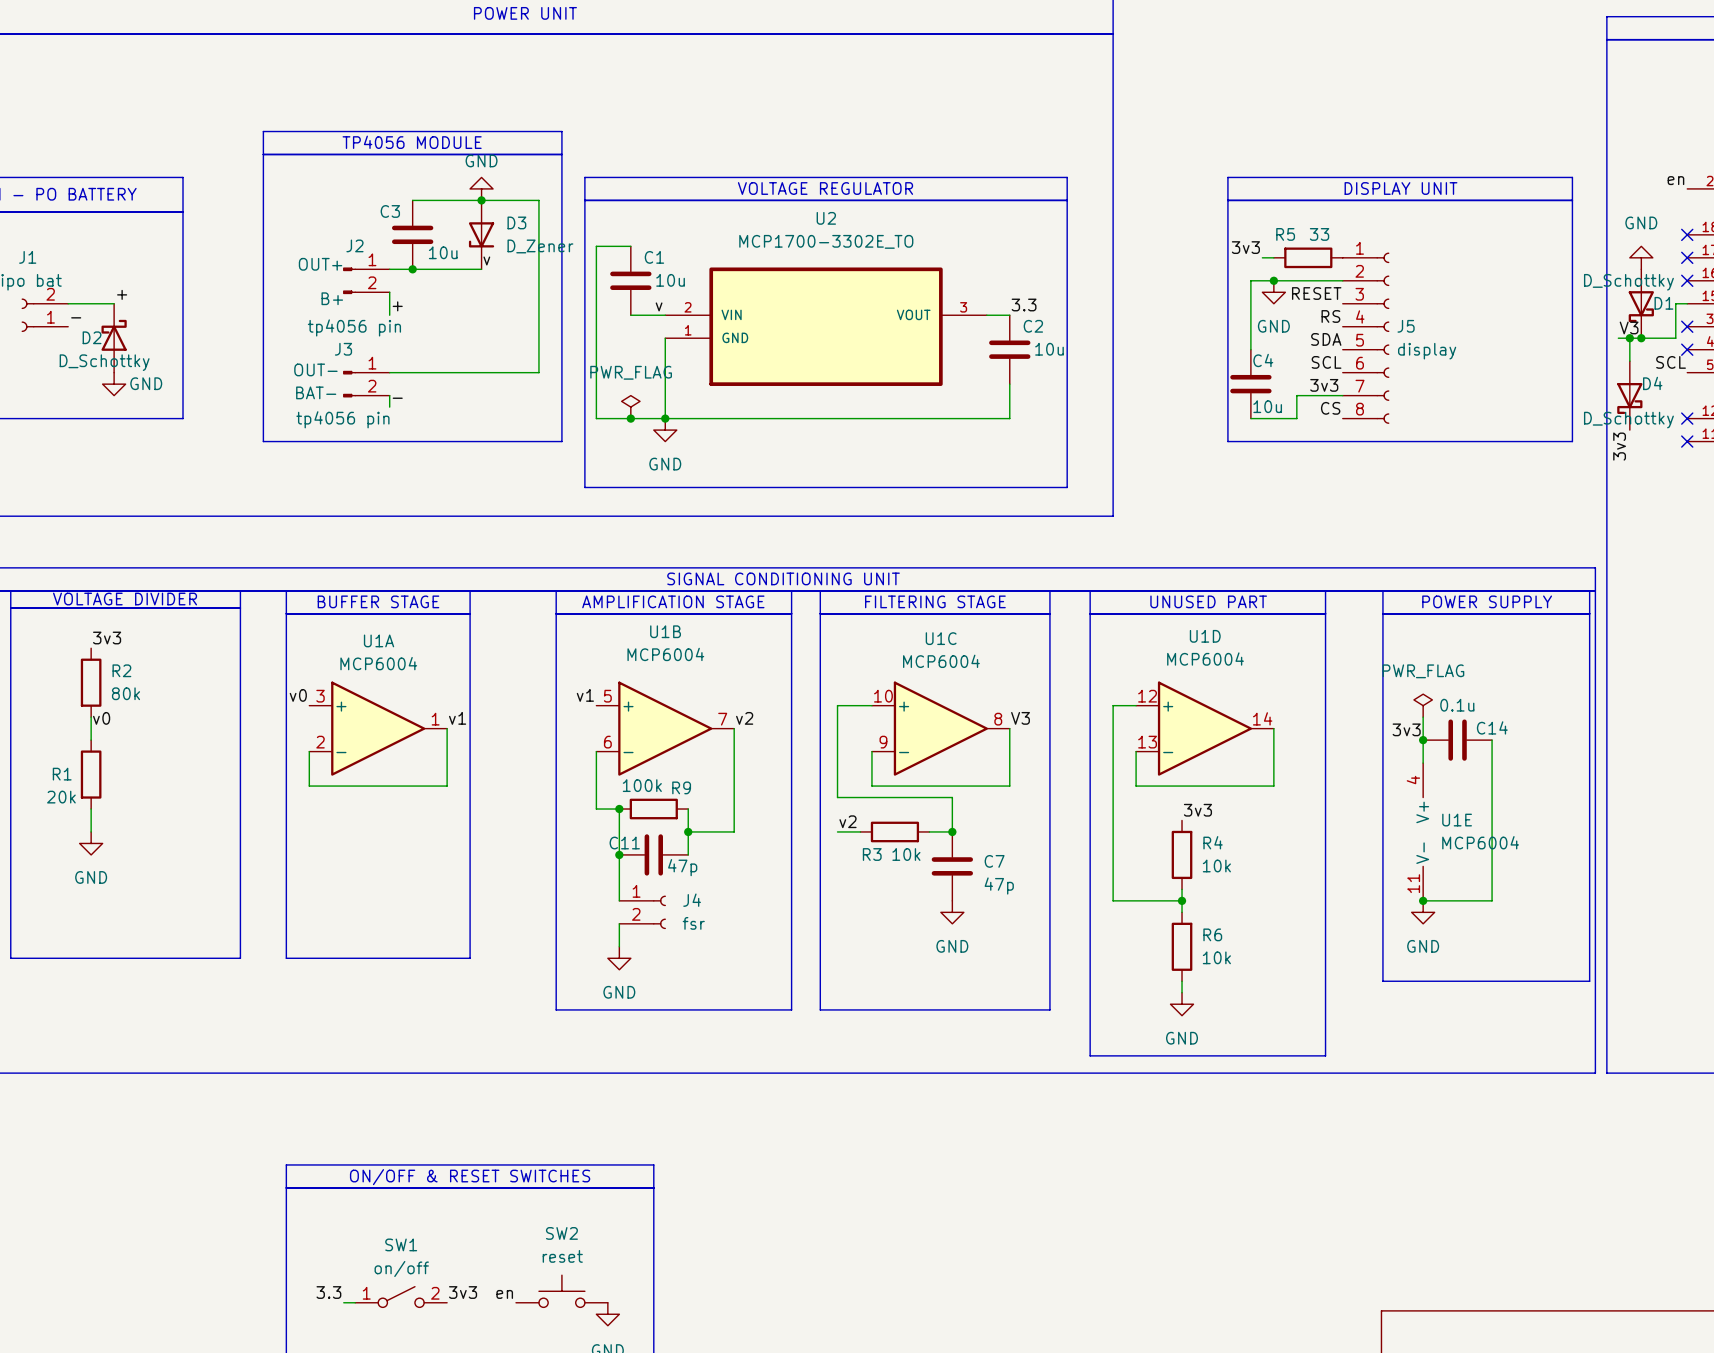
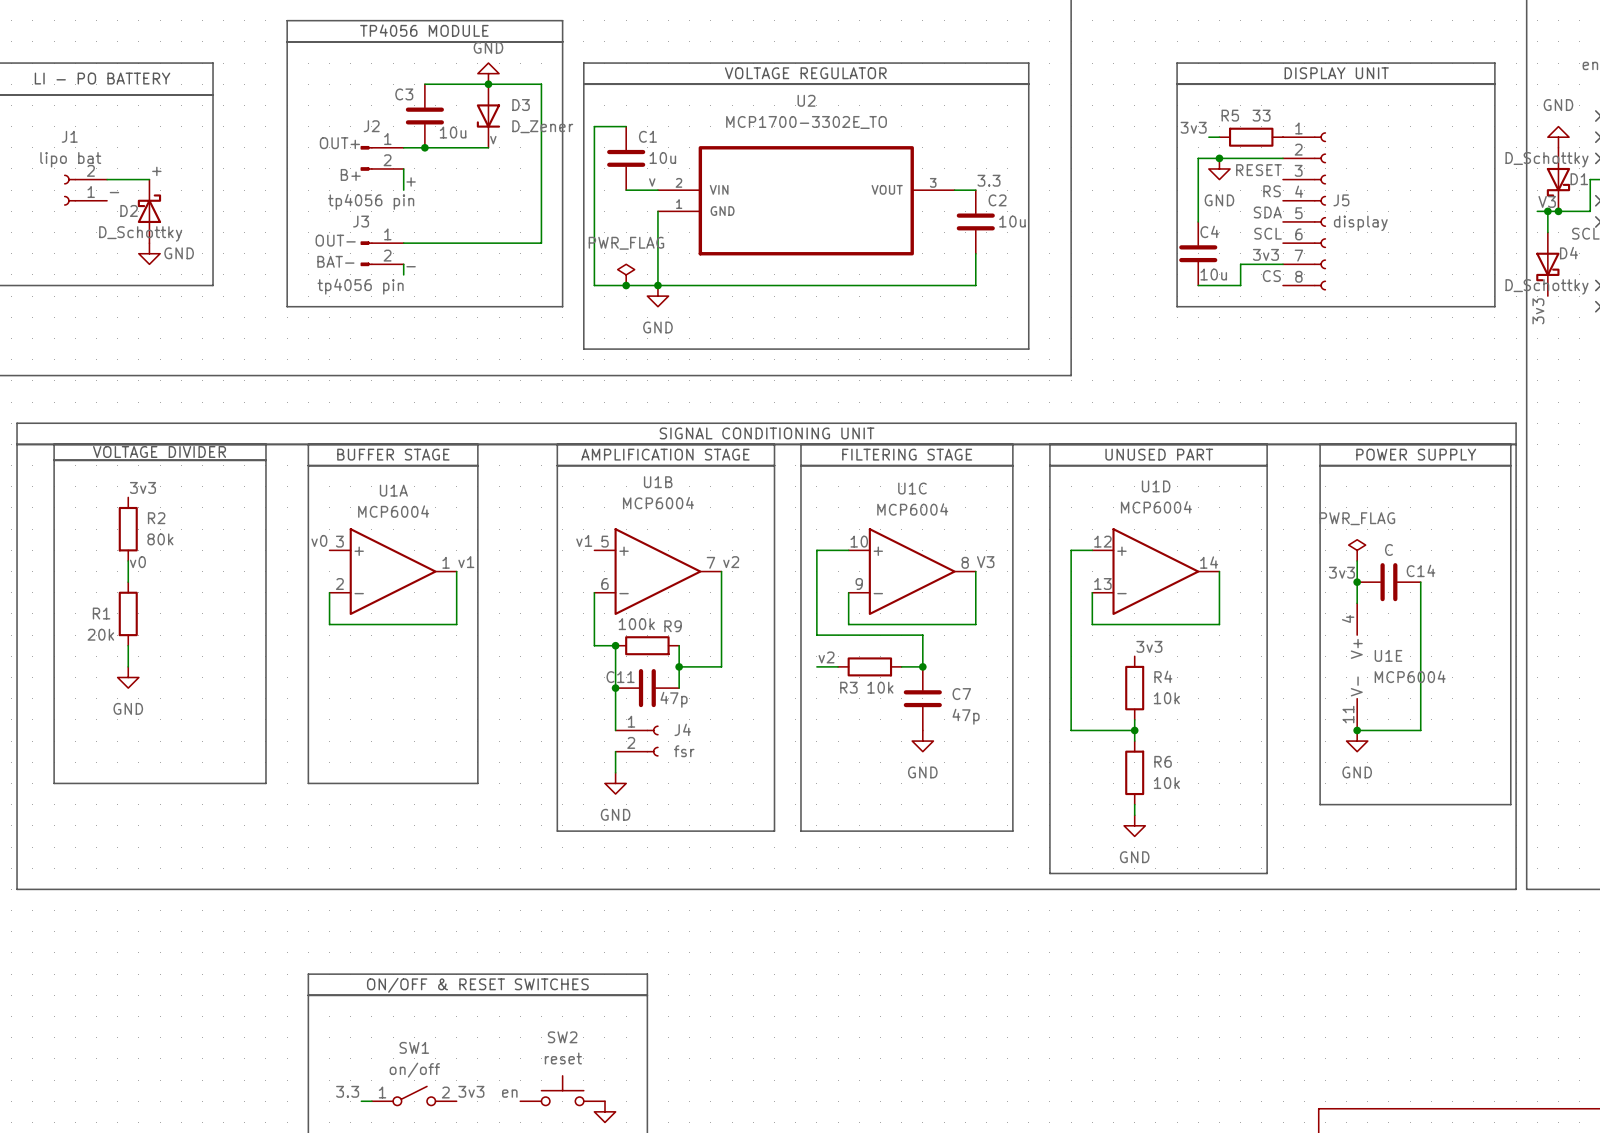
C14 value: 0.1u (1457, 705) -> C (1388, 549)

